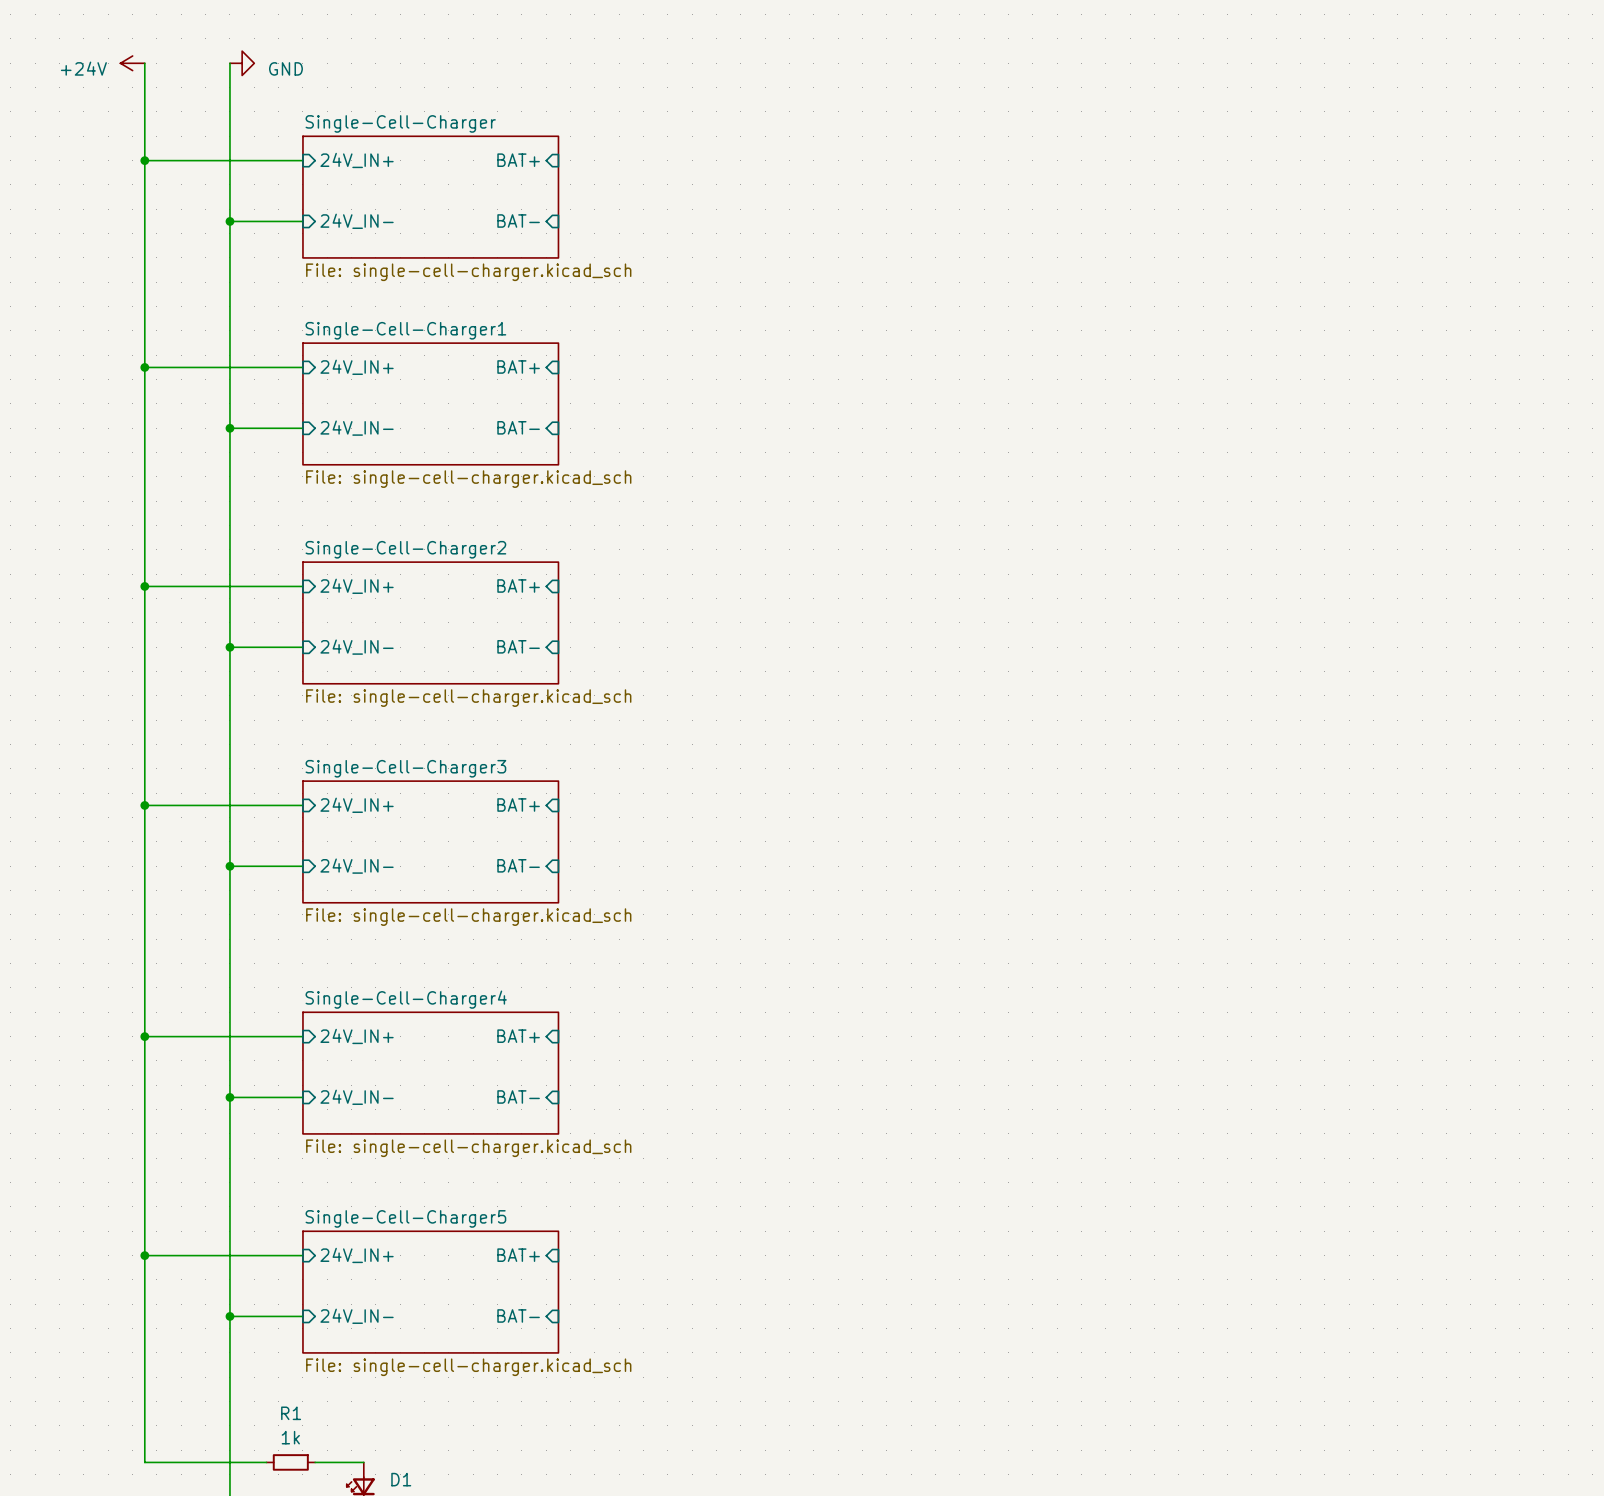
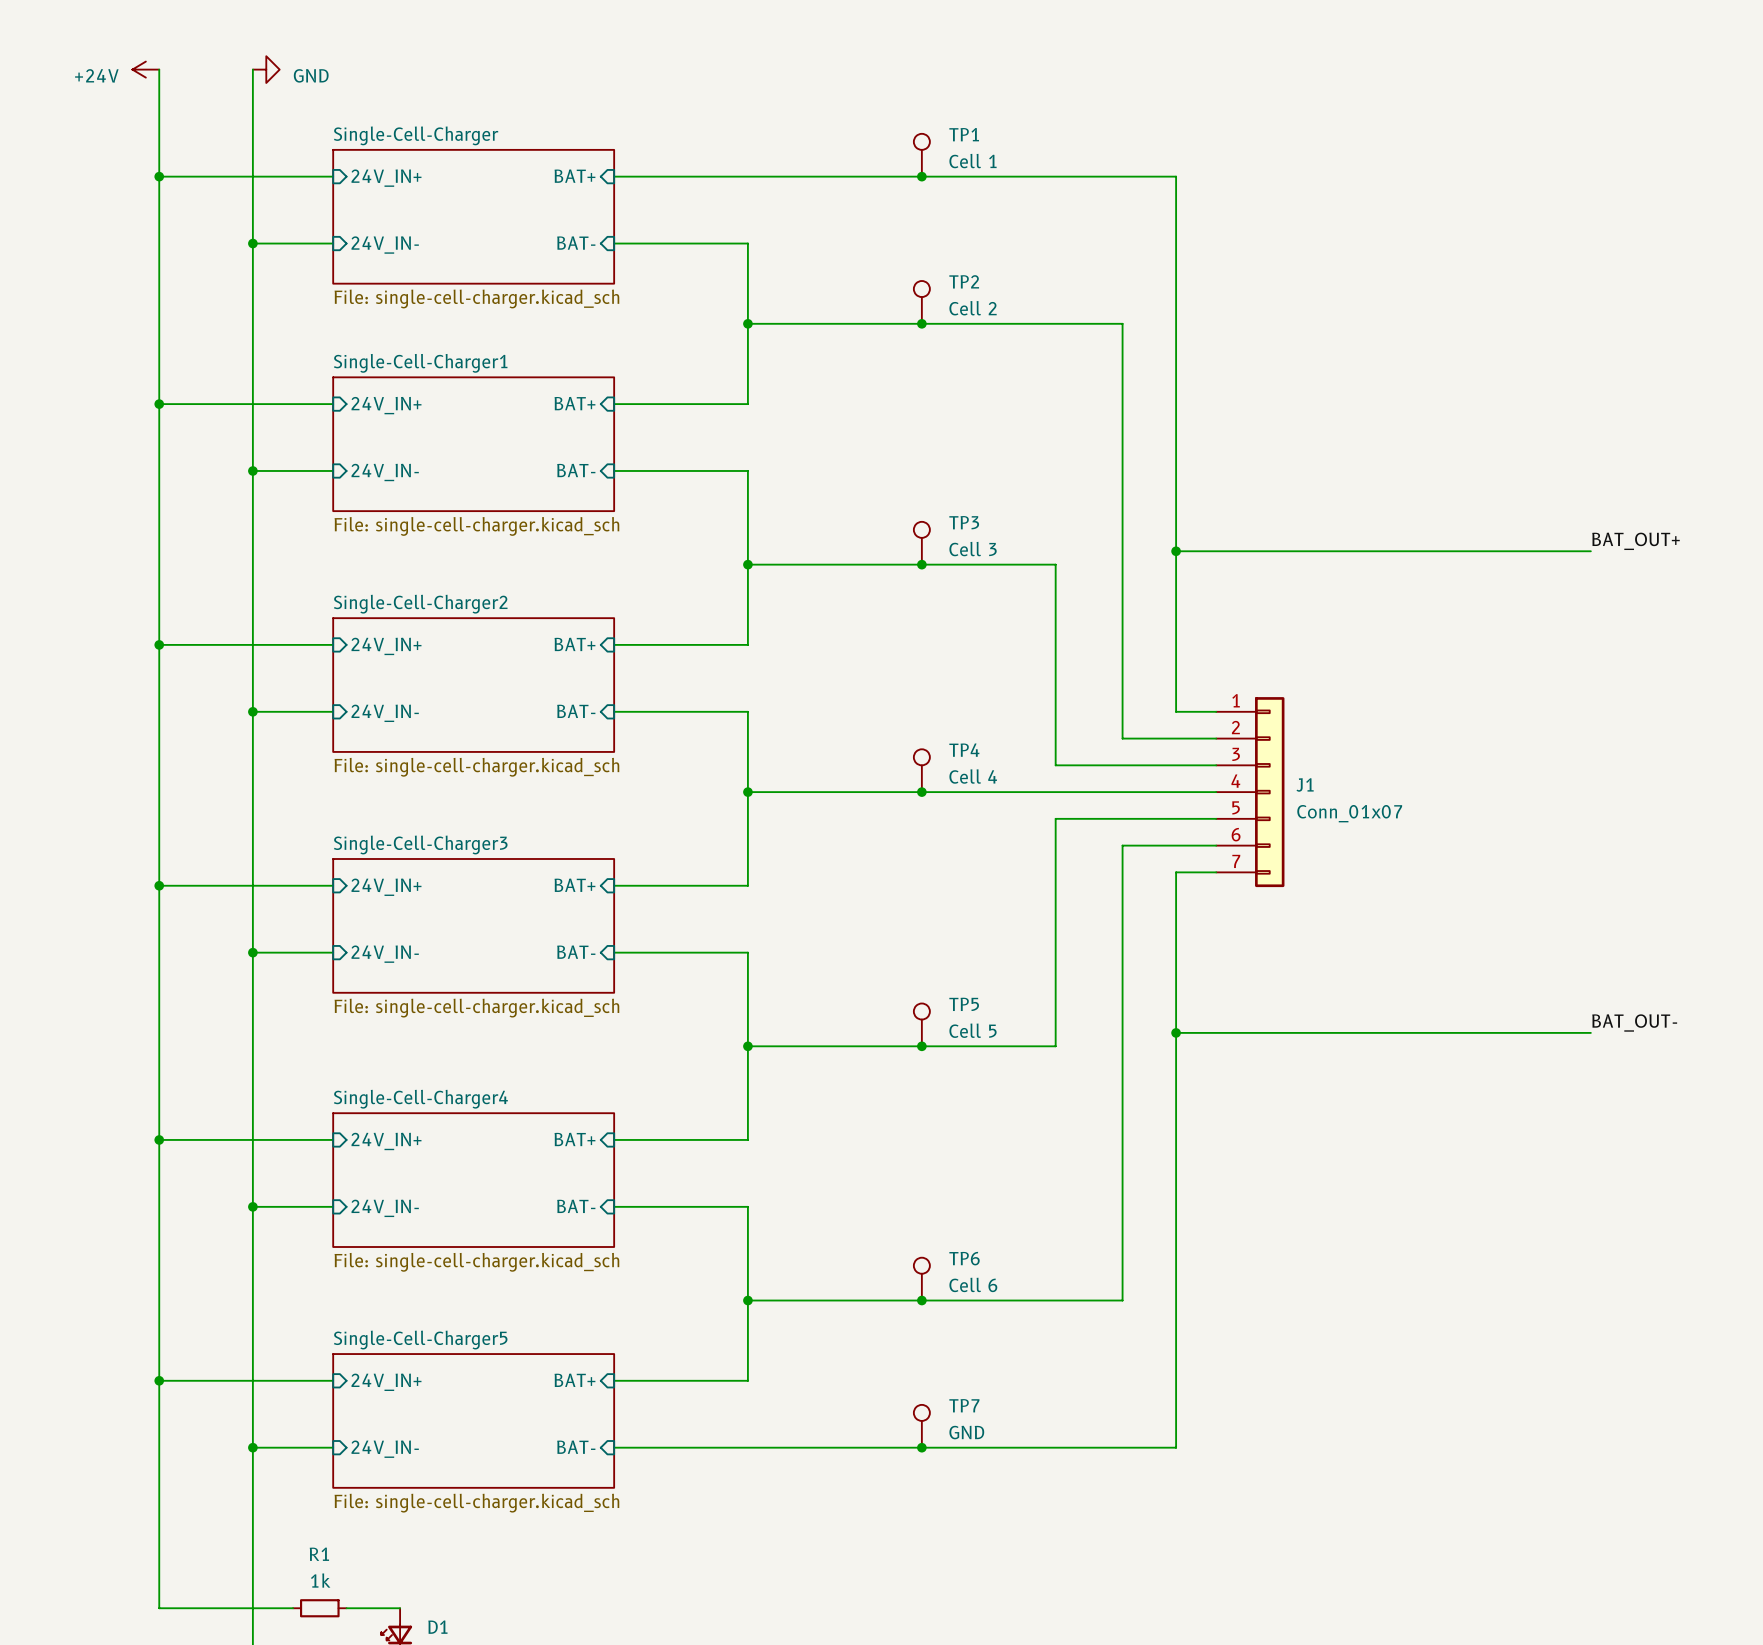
TP1: none -> Cell 1 (921, 155)
wire: none -> (614, 176) (1176, 176) (1176, 711) (1216, 711)
junction: none -> (921, 176)
wire: none -> (614, 243) (747, 243) (747, 404) (614, 404)
TP2: none -> Cell 2 (921, 302)
wire: none -> (747, 323) (1122, 323) (1122, 738) (1216, 738)
junction: none -> (747, 323)
junction: none -> (921, 323)
wire: none -> (614, 470) (747, 470) (747, 644) (614, 644)
label: none -> BAT_OUT+ (1636, 541)
TP3: none -> Cell 3 (921, 543)
wire: none -> (1176, 551) (1590, 551)
junction: none -> (1176, 551)
wire: none -> (747, 564) (1055, 564) (1055, 765) (1216, 765)
junction: none -> (747, 564)
junction: none -> (921, 564)
wire: none -> (614, 711) (747, 711) (747, 885) (614, 885)
TP4: none -> Cell 4 (921, 770)
wire: none -> (747, 792) (1216, 792)
junction: none -> (747, 792)
junction: none -> (921, 792)
J1: none -> Conn_01x07 (1250, 792)
wire: none -> (1216, 818) (1055, 818) (1055, 1046) (747, 1046)
wire: none -> (1216, 845) (1122, 845) (1122, 1300) (747, 1300)
wire: none -> (1216, 872) (1176, 872) (1176, 1447) (614, 1447)
wire: none -> (614, 952) (747, 952) (747, 1139) (614, 1139)
label: none -> BAT_OUT- (1634, 1022)
TP5: none -> Cell 5 (921, 1024)
wire: none -> (1176, 1032) (1590, 1032)
junction: none -> (1176, 1032)
junction: none -> (747, 1046)
junction: none -> (921, 1046)
wire: none -> (614, 1206) (747, 1206) (747, 1380) (614, 1380)
TP6: none -> Cell 6 (921, 1279)
junction: none -> (747, 1300)
junction: none -> (921, 1300)
TP7: none -> GND (921, 1426)
junction: none -> (921, 1447)

